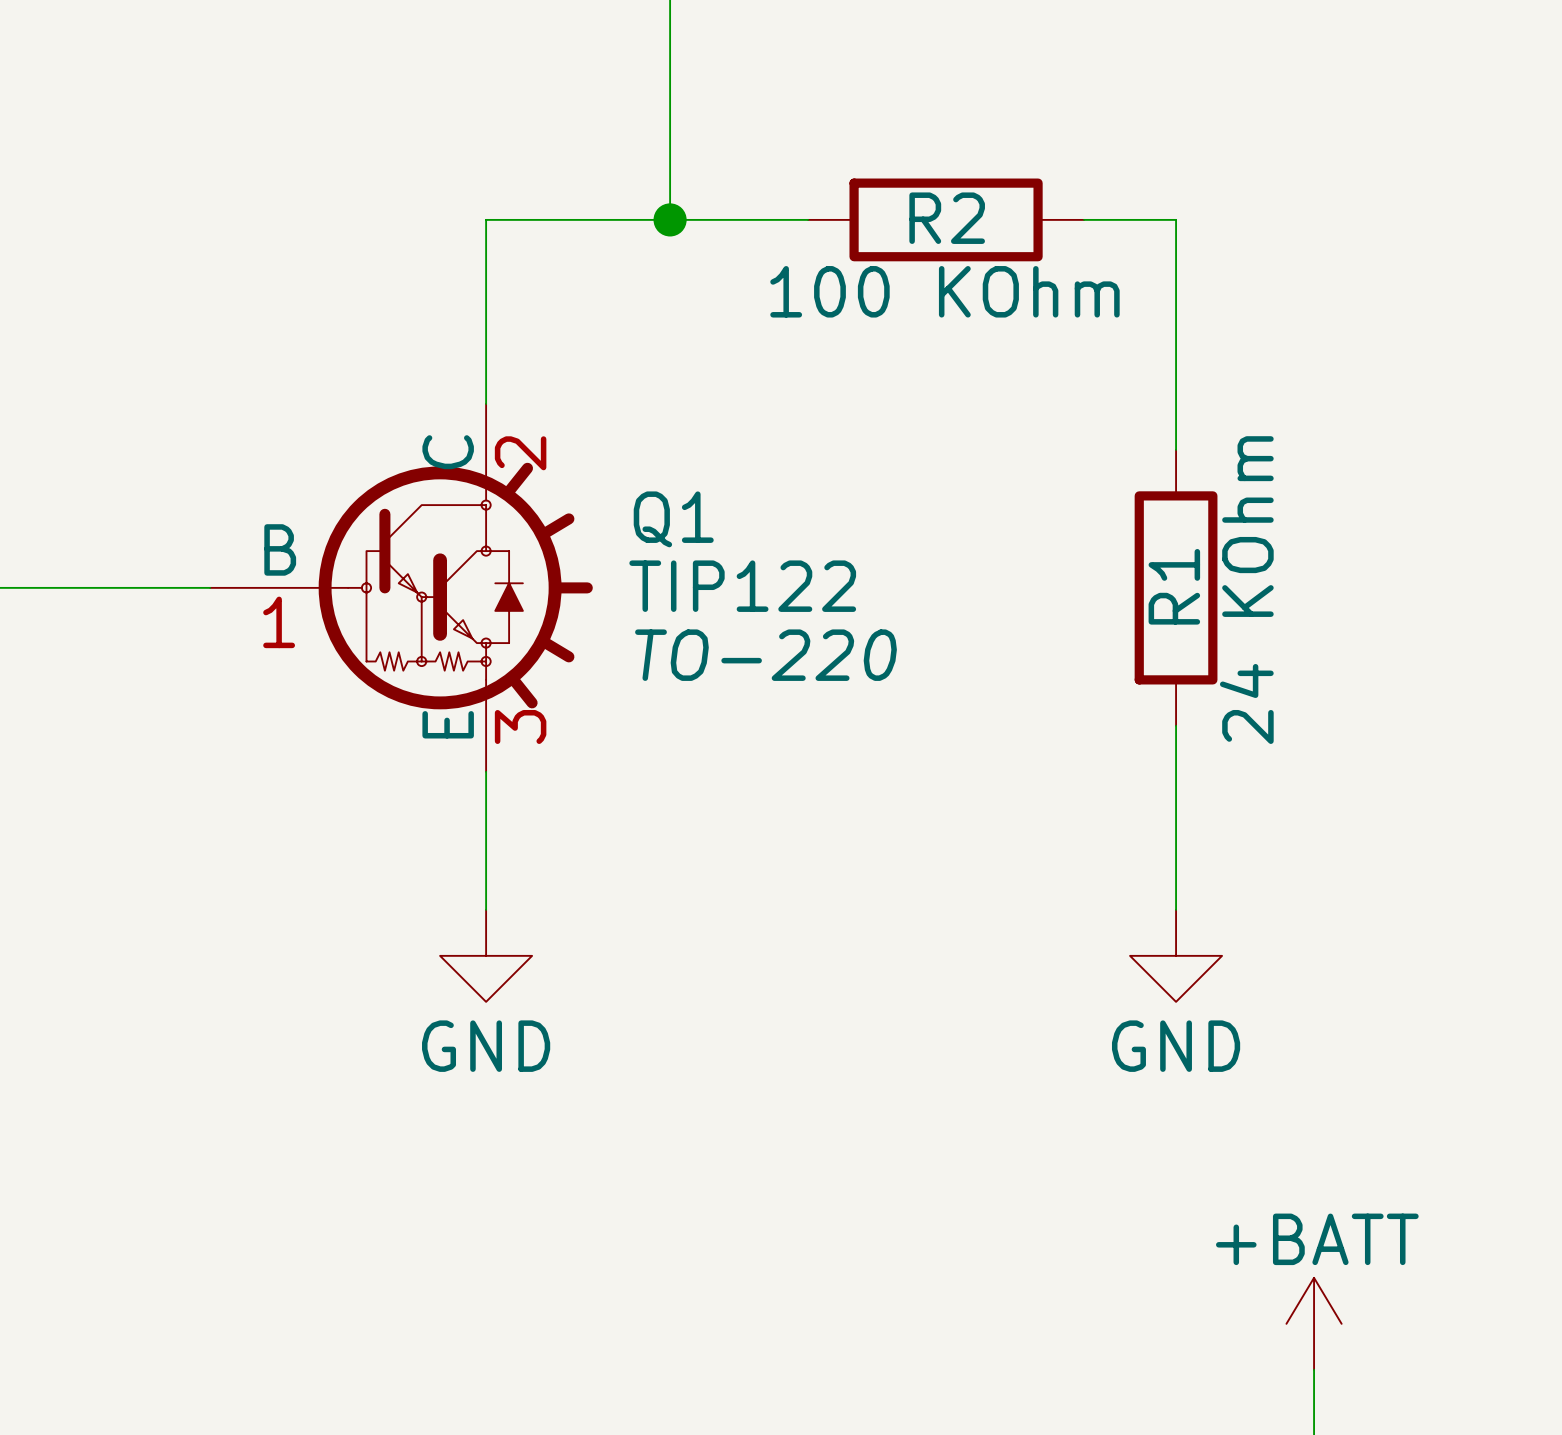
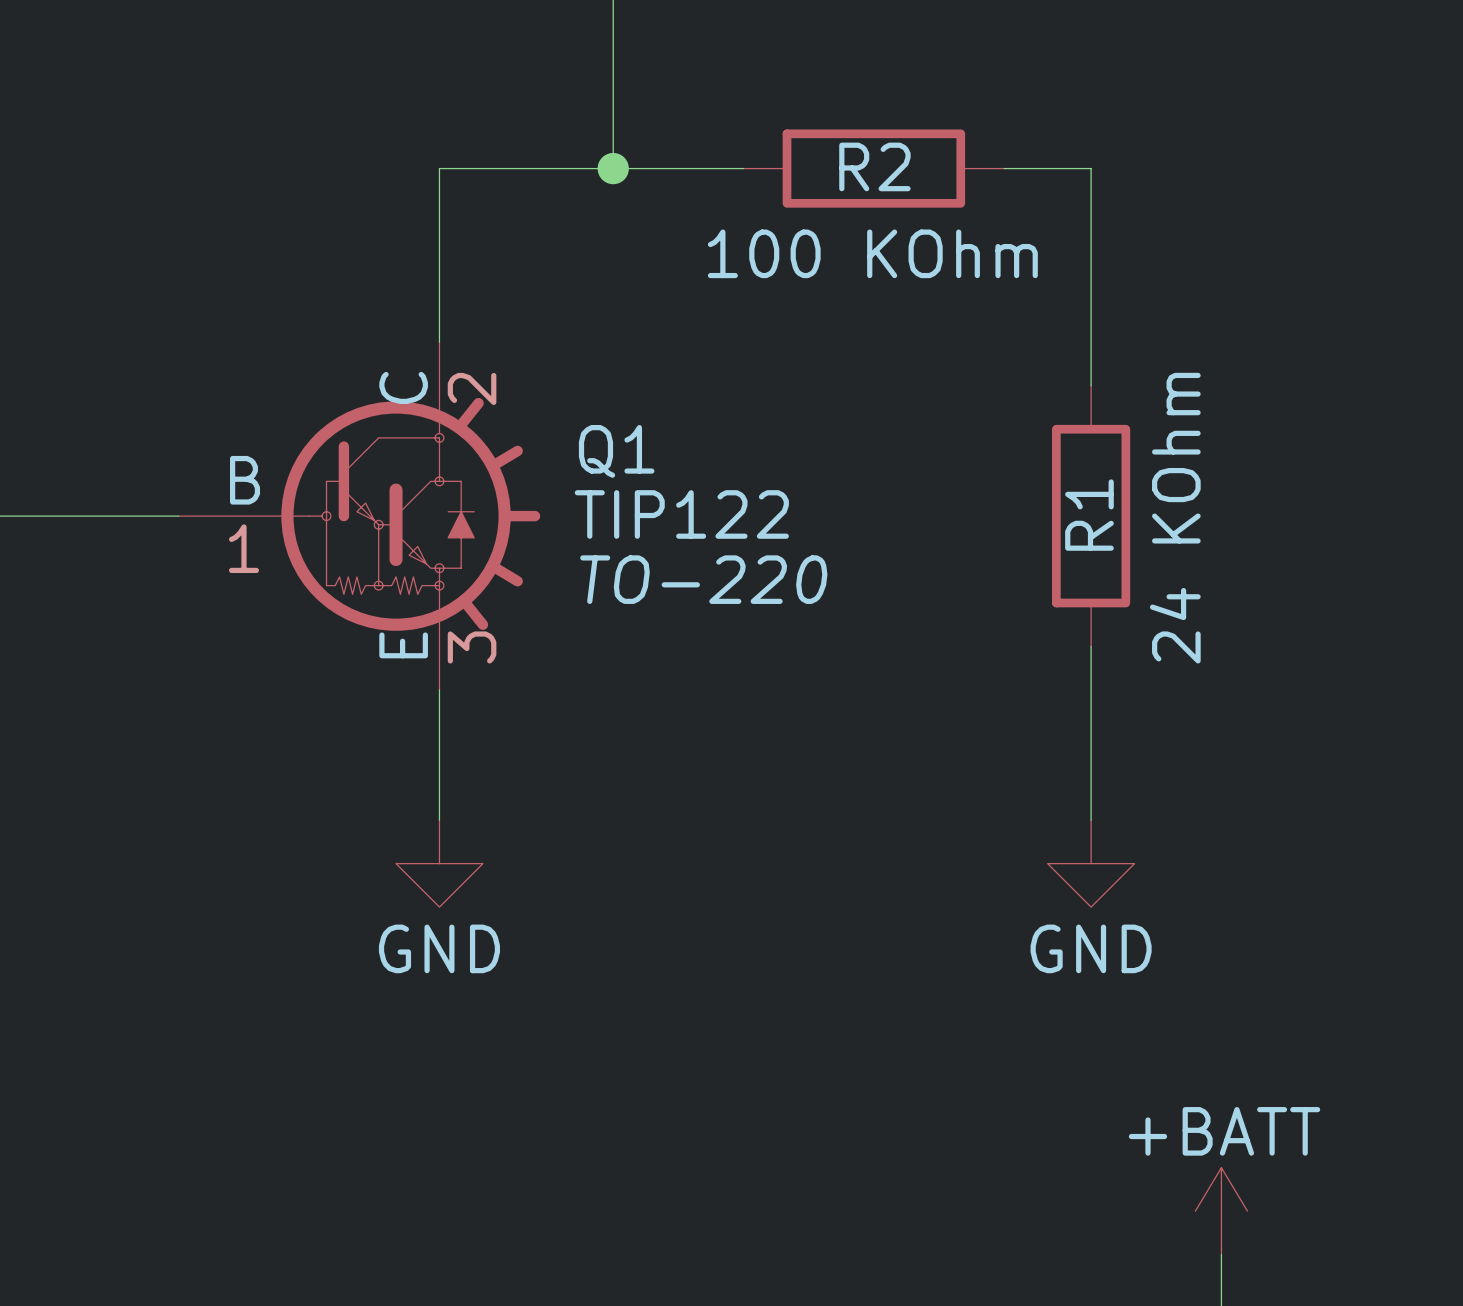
100 KOhm name position: 100 KOhm (944, 291) -> 100 KOhm (872, 253)
24 KOhm name position: 24 KOhm (1246, 590) -> 24 KOhm (1175, 518)

